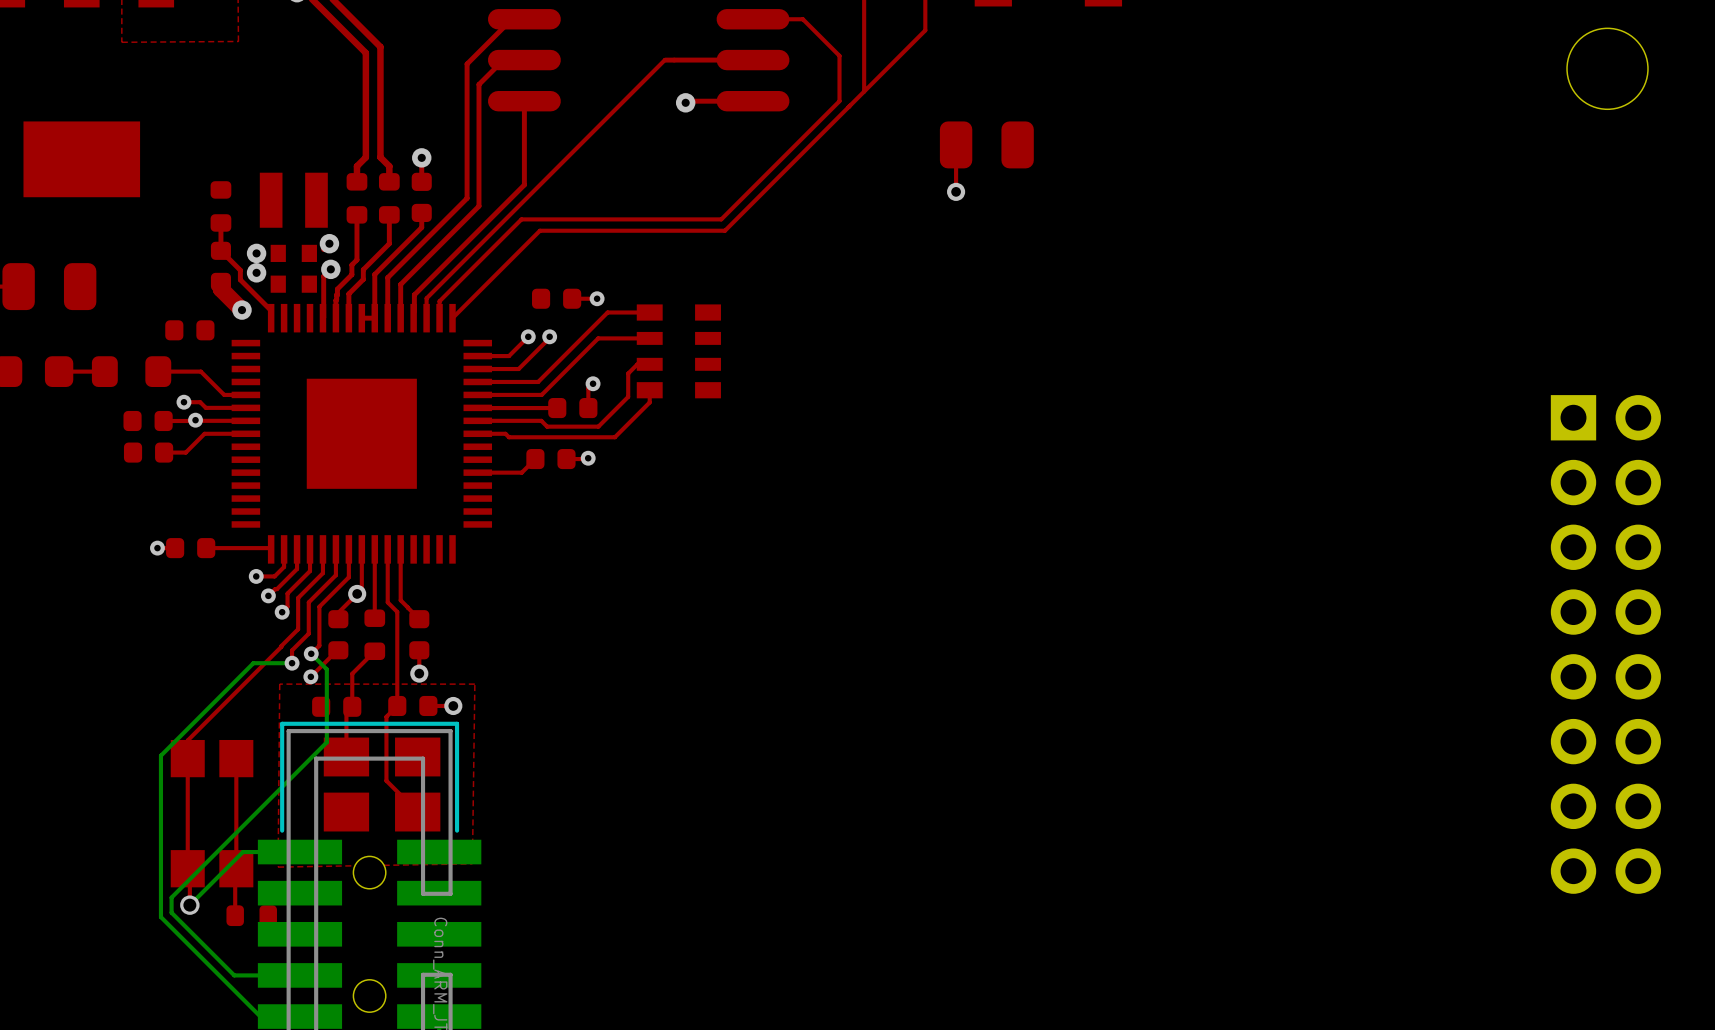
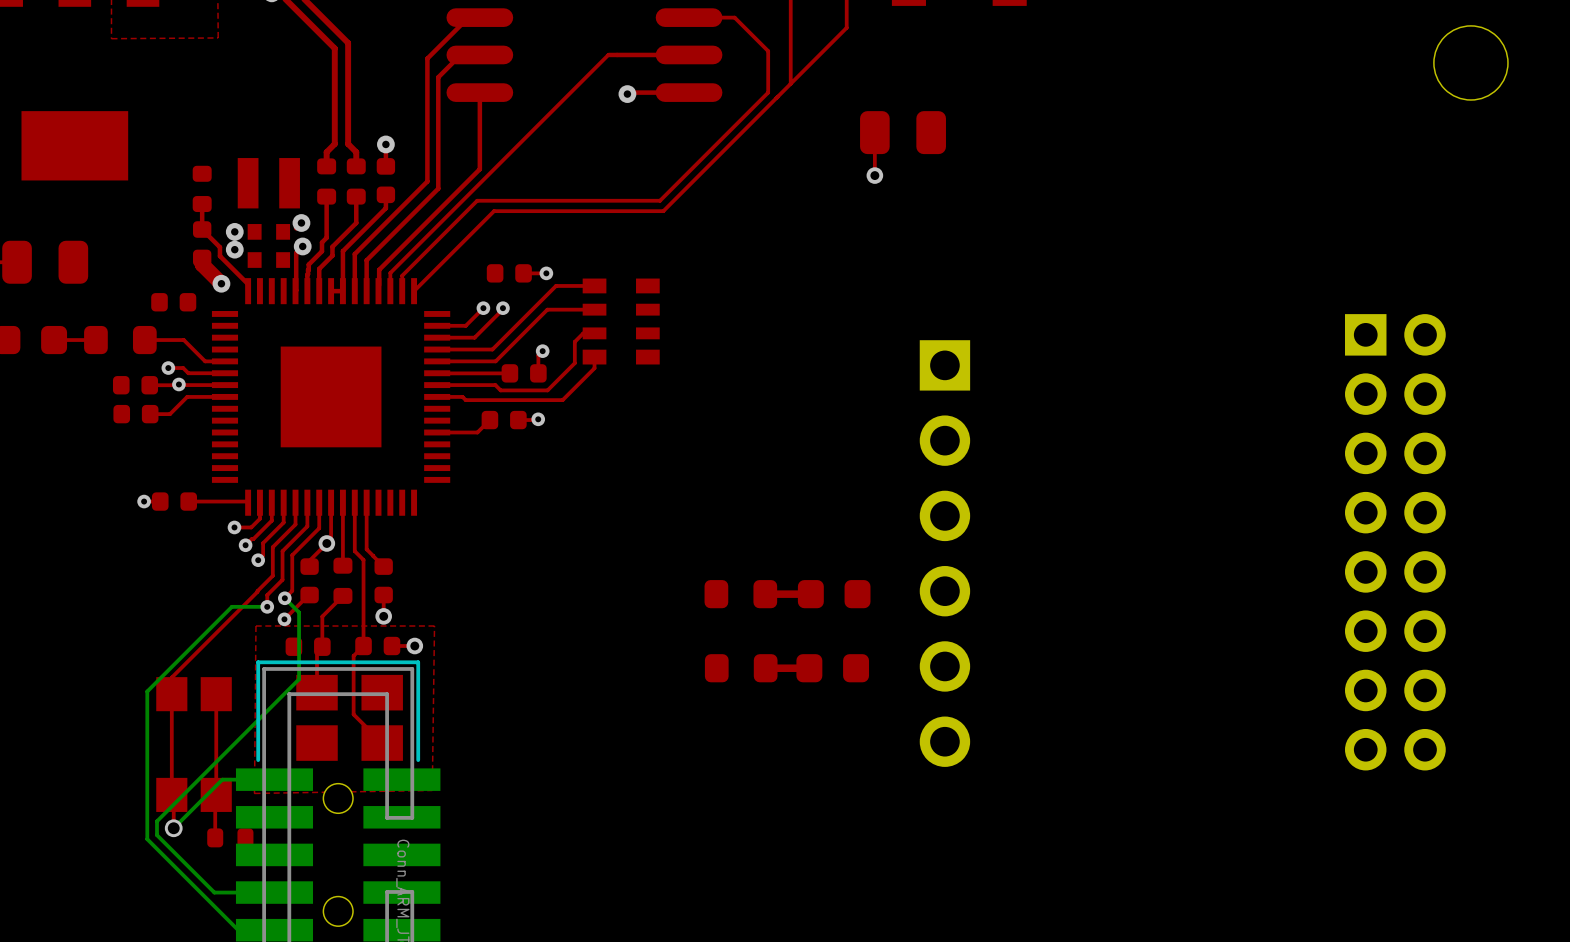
part: none -> (944, 553)
part position: (1605, 644) -> (1395, 542)
part: none -> (740, 594)
top track: none -> (810, 594) (765, 594)
part: none -> (834, 594)
part: none -> (741, 668)
top track: none -> (809, 668) (765, 668)
part: none -> (832, 668)

